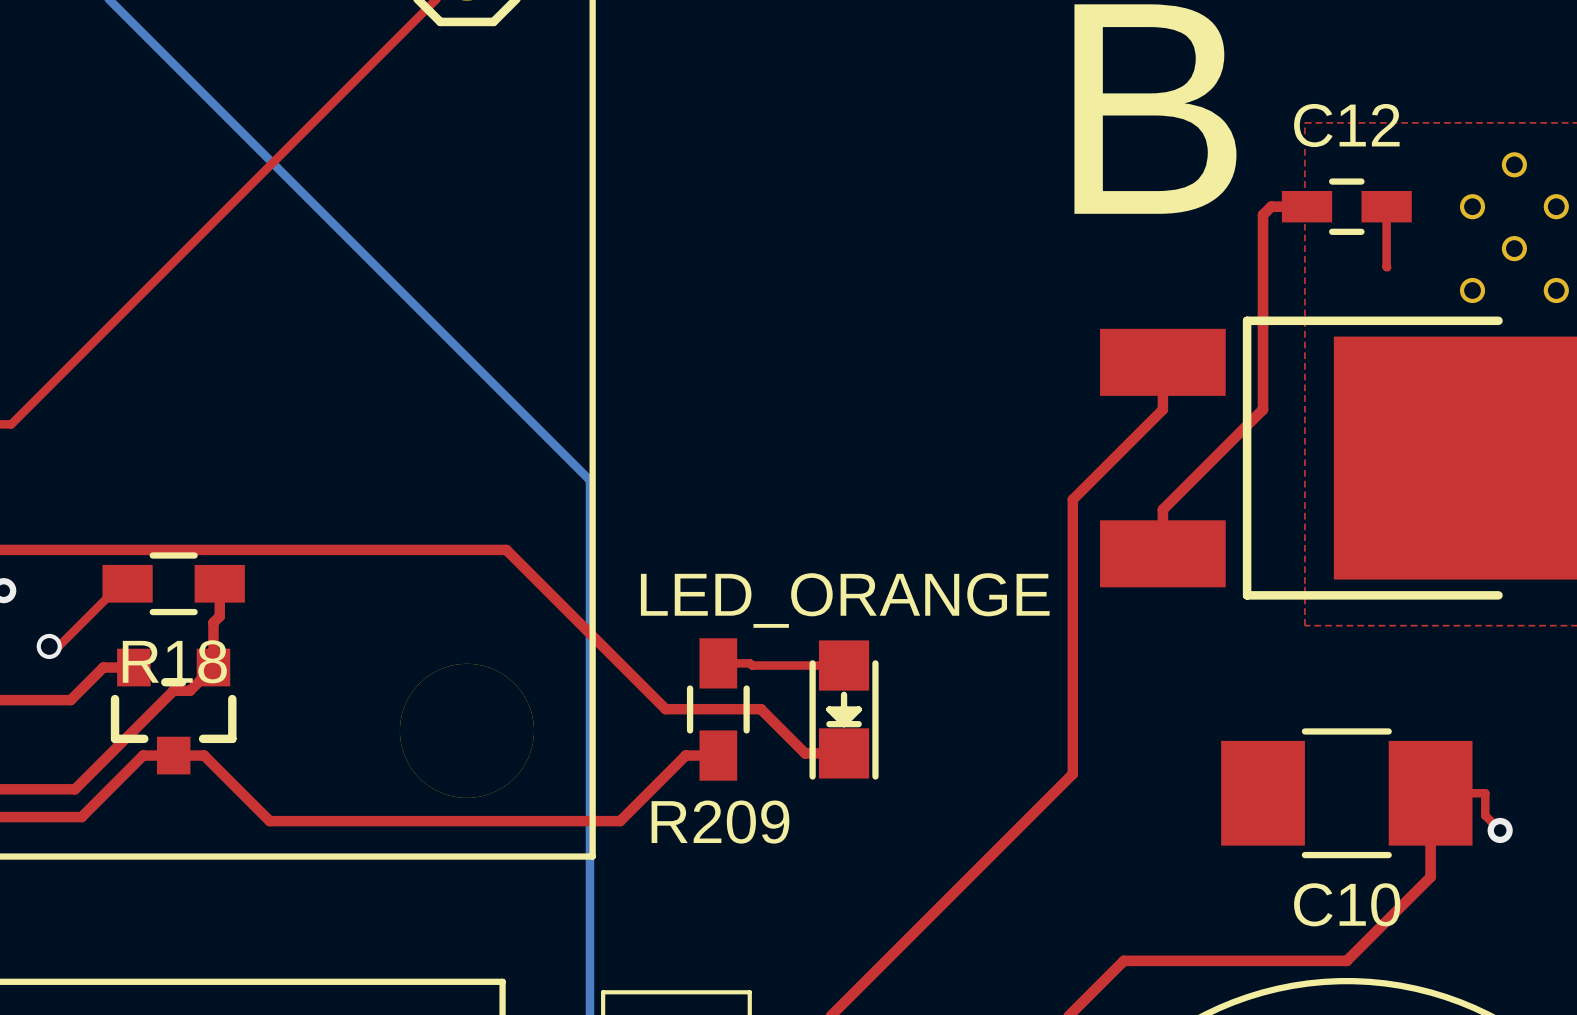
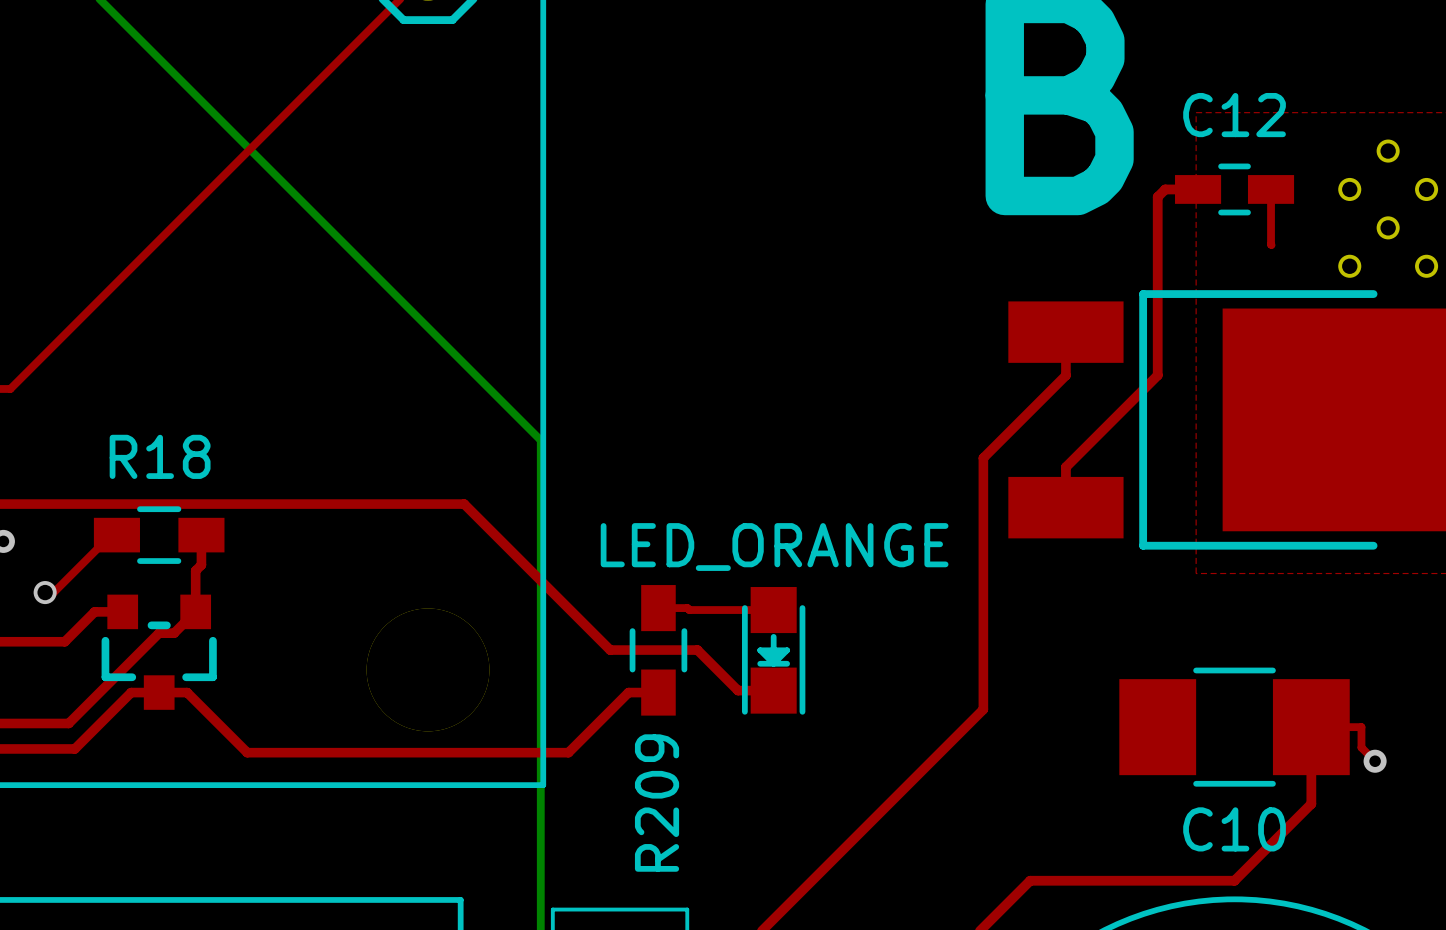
R18 name position: R18 (174, 661) -> R18 (160, 456)
R209 name rotation: 0° (720, 822) -> 90° counterclockwise (657, 803)

